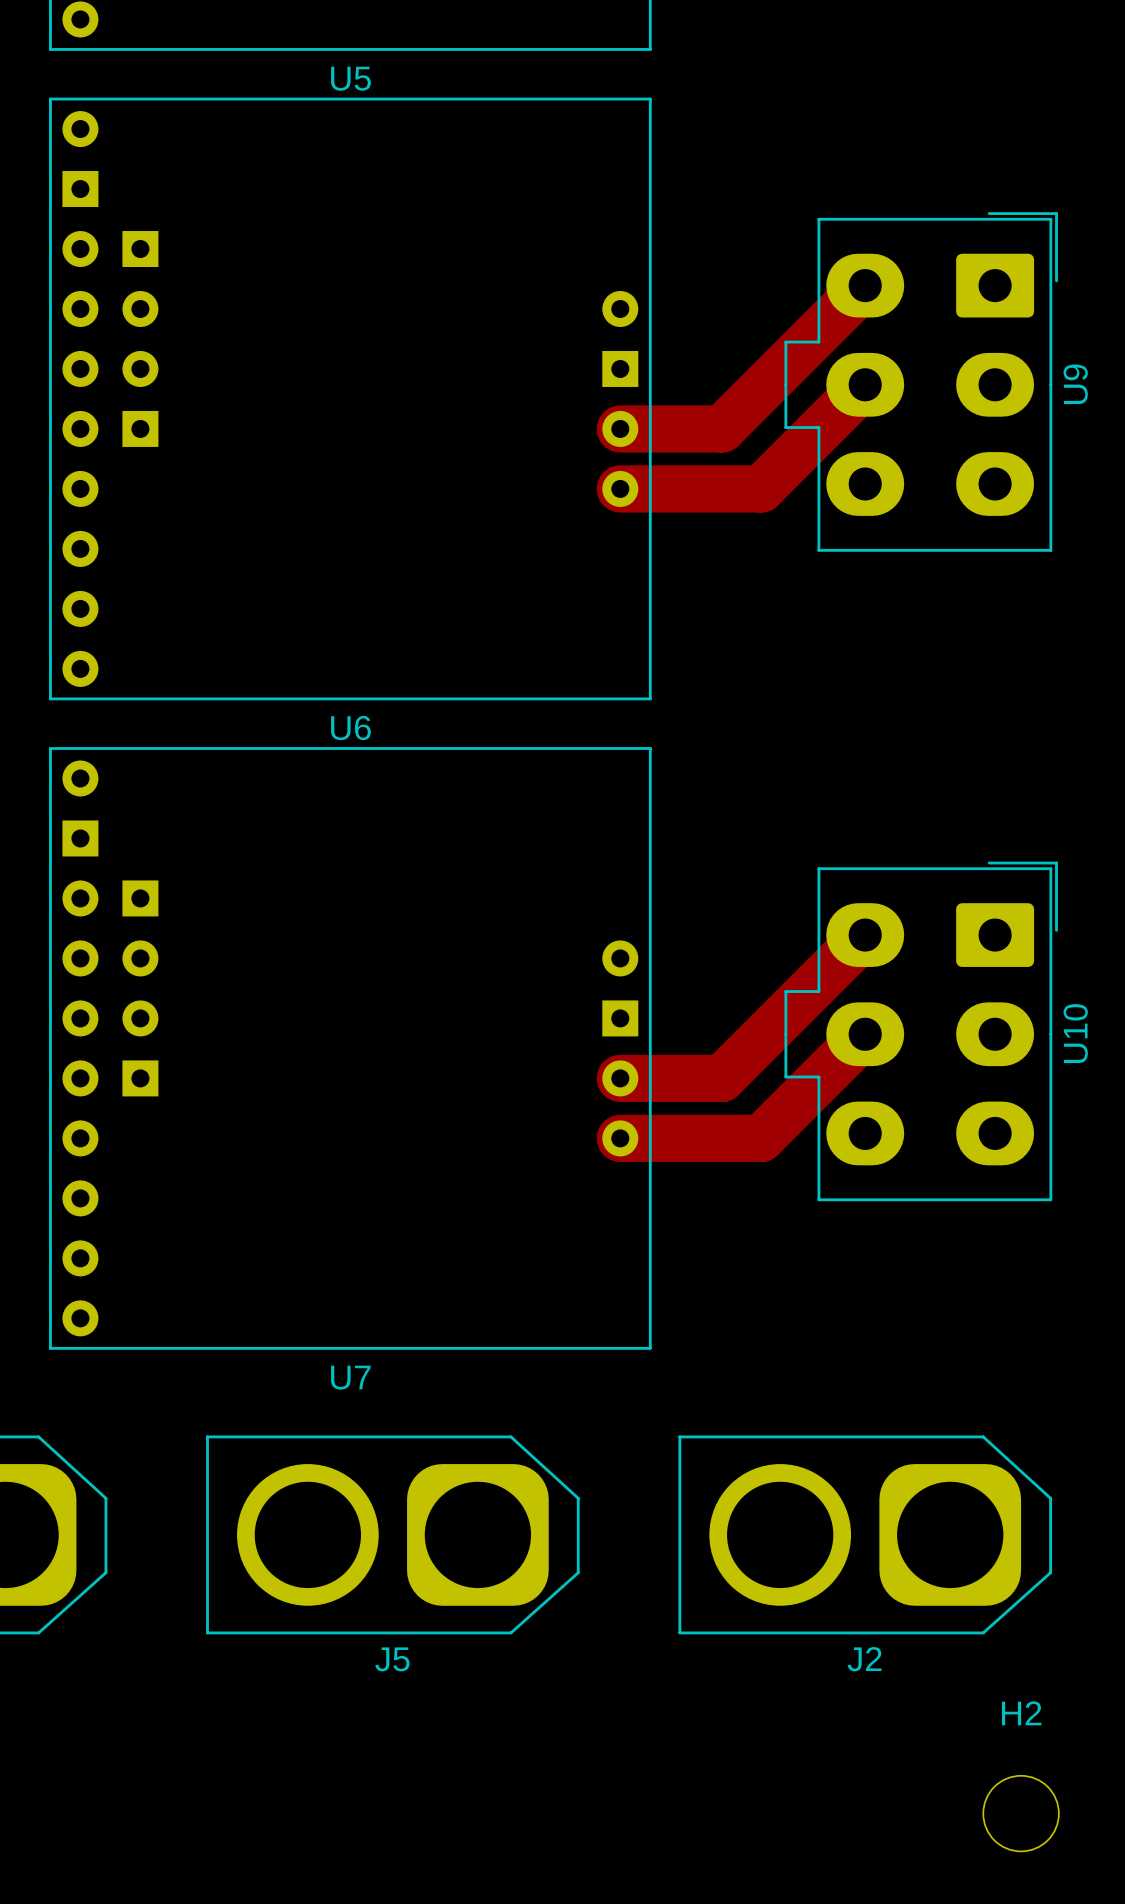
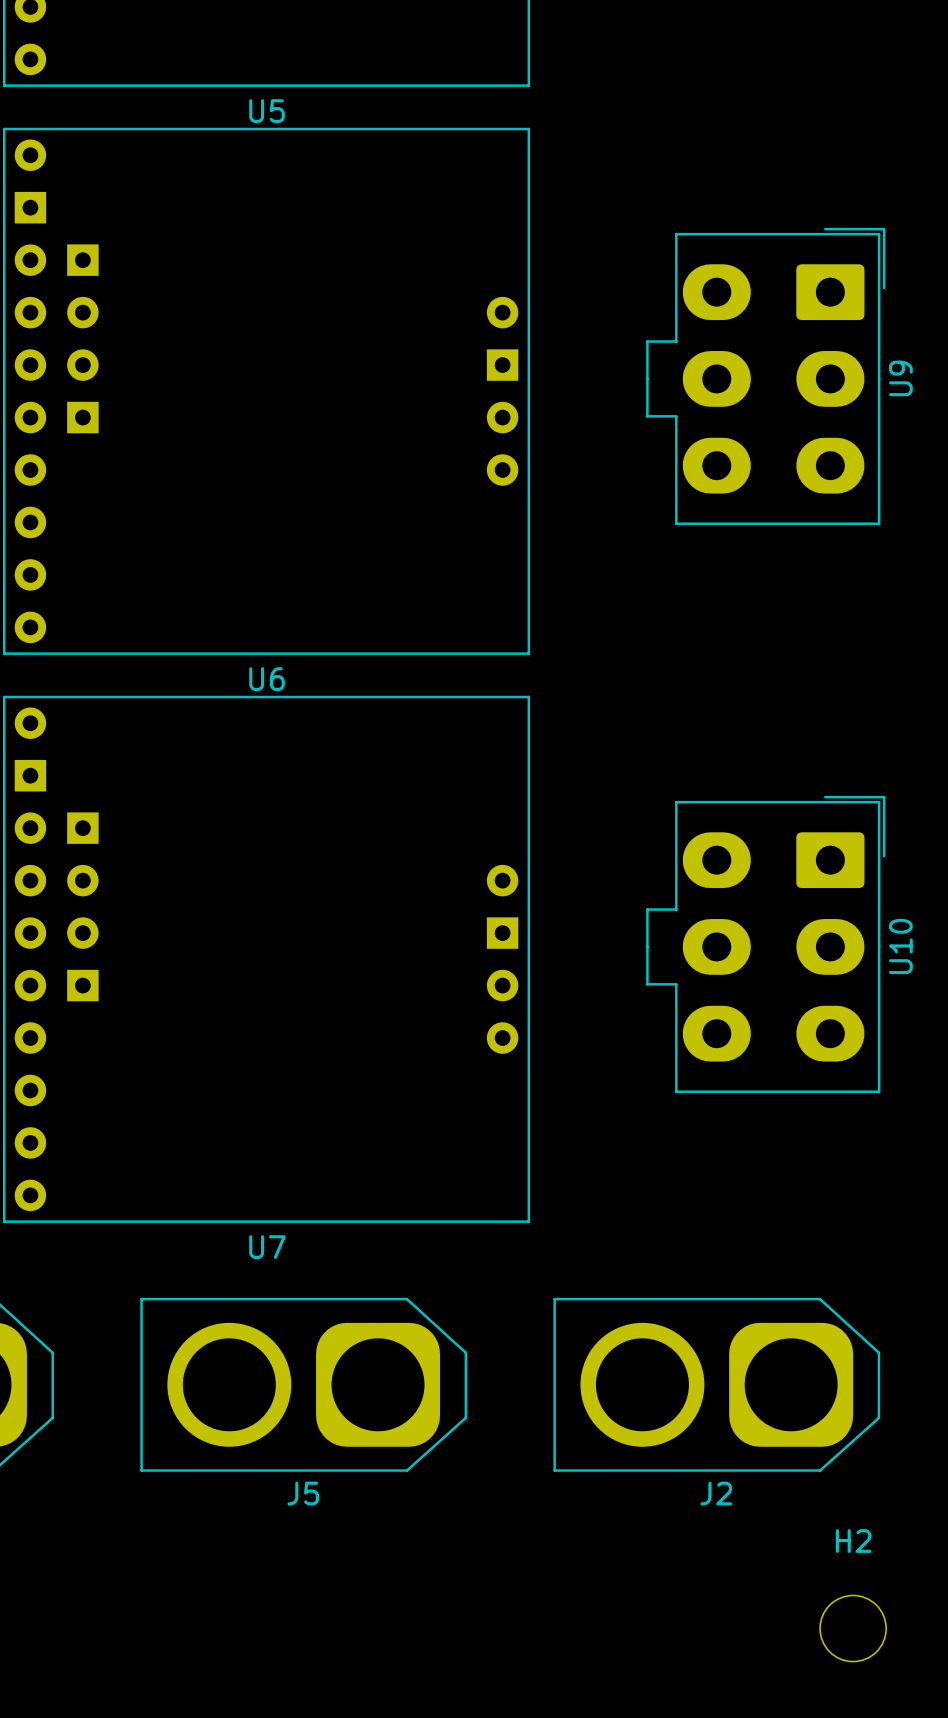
track: (865, 285) (721, 428) (620, 428) -> none
track: (865, 384) (761, 488) (620, 488) -> none
track: (865, 935) (721, 1078) (620, 1078) -> none
track: (865, 1034) (761, 1138) (620, 1138) -> none

